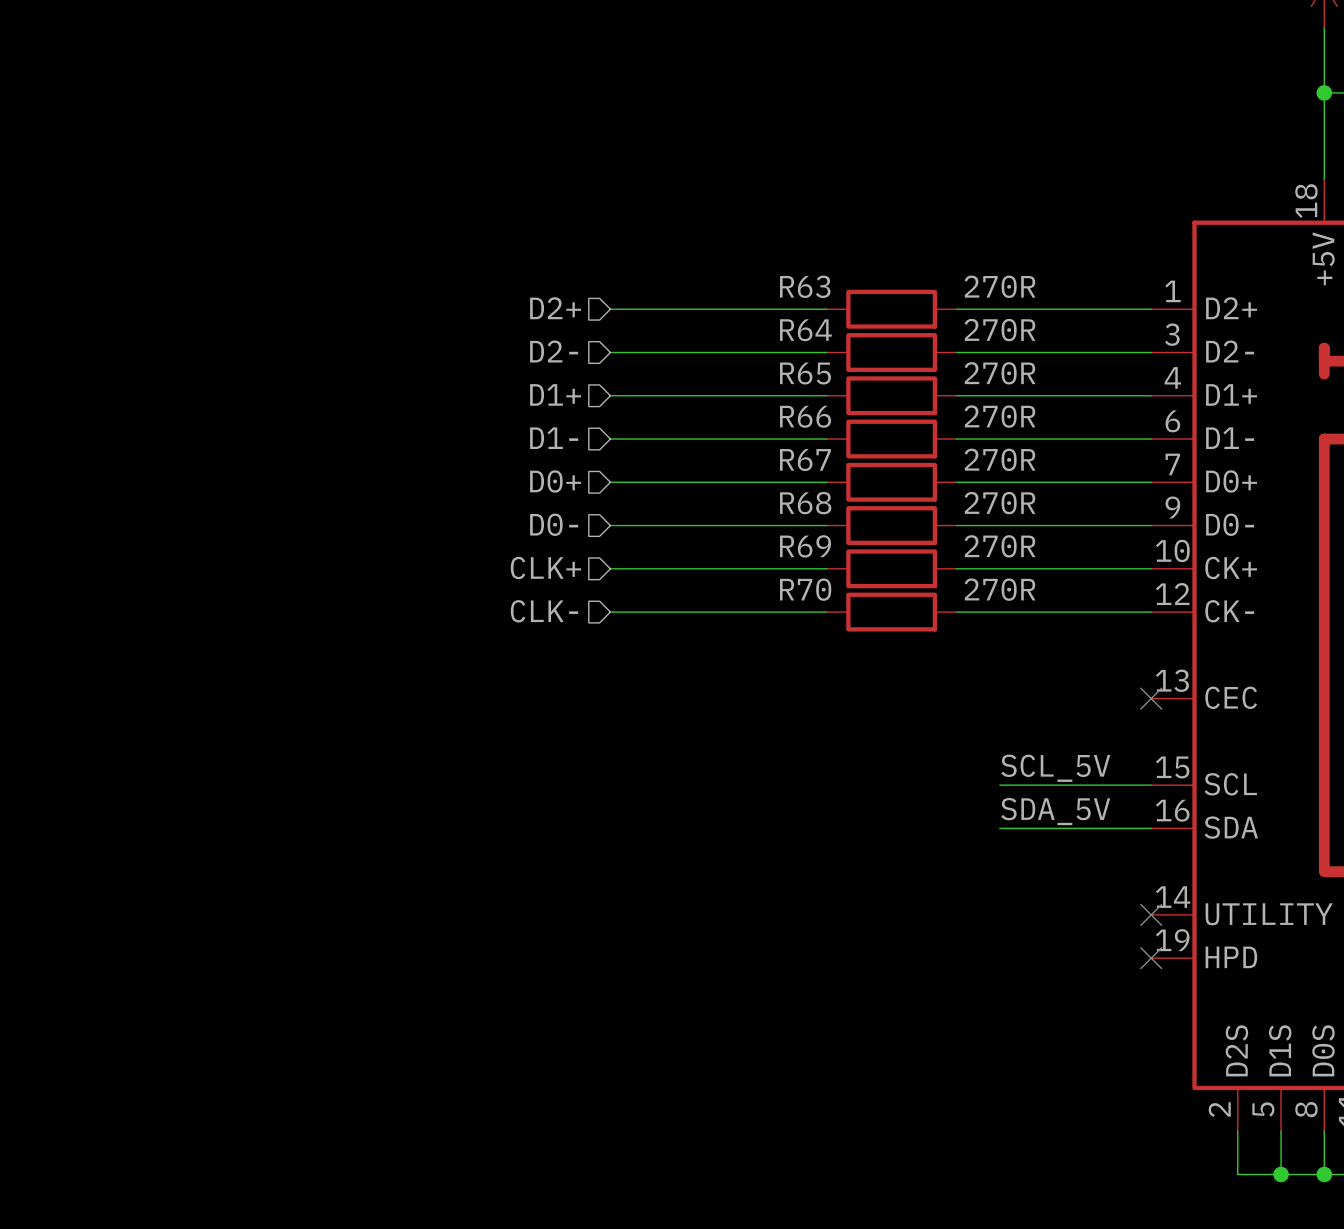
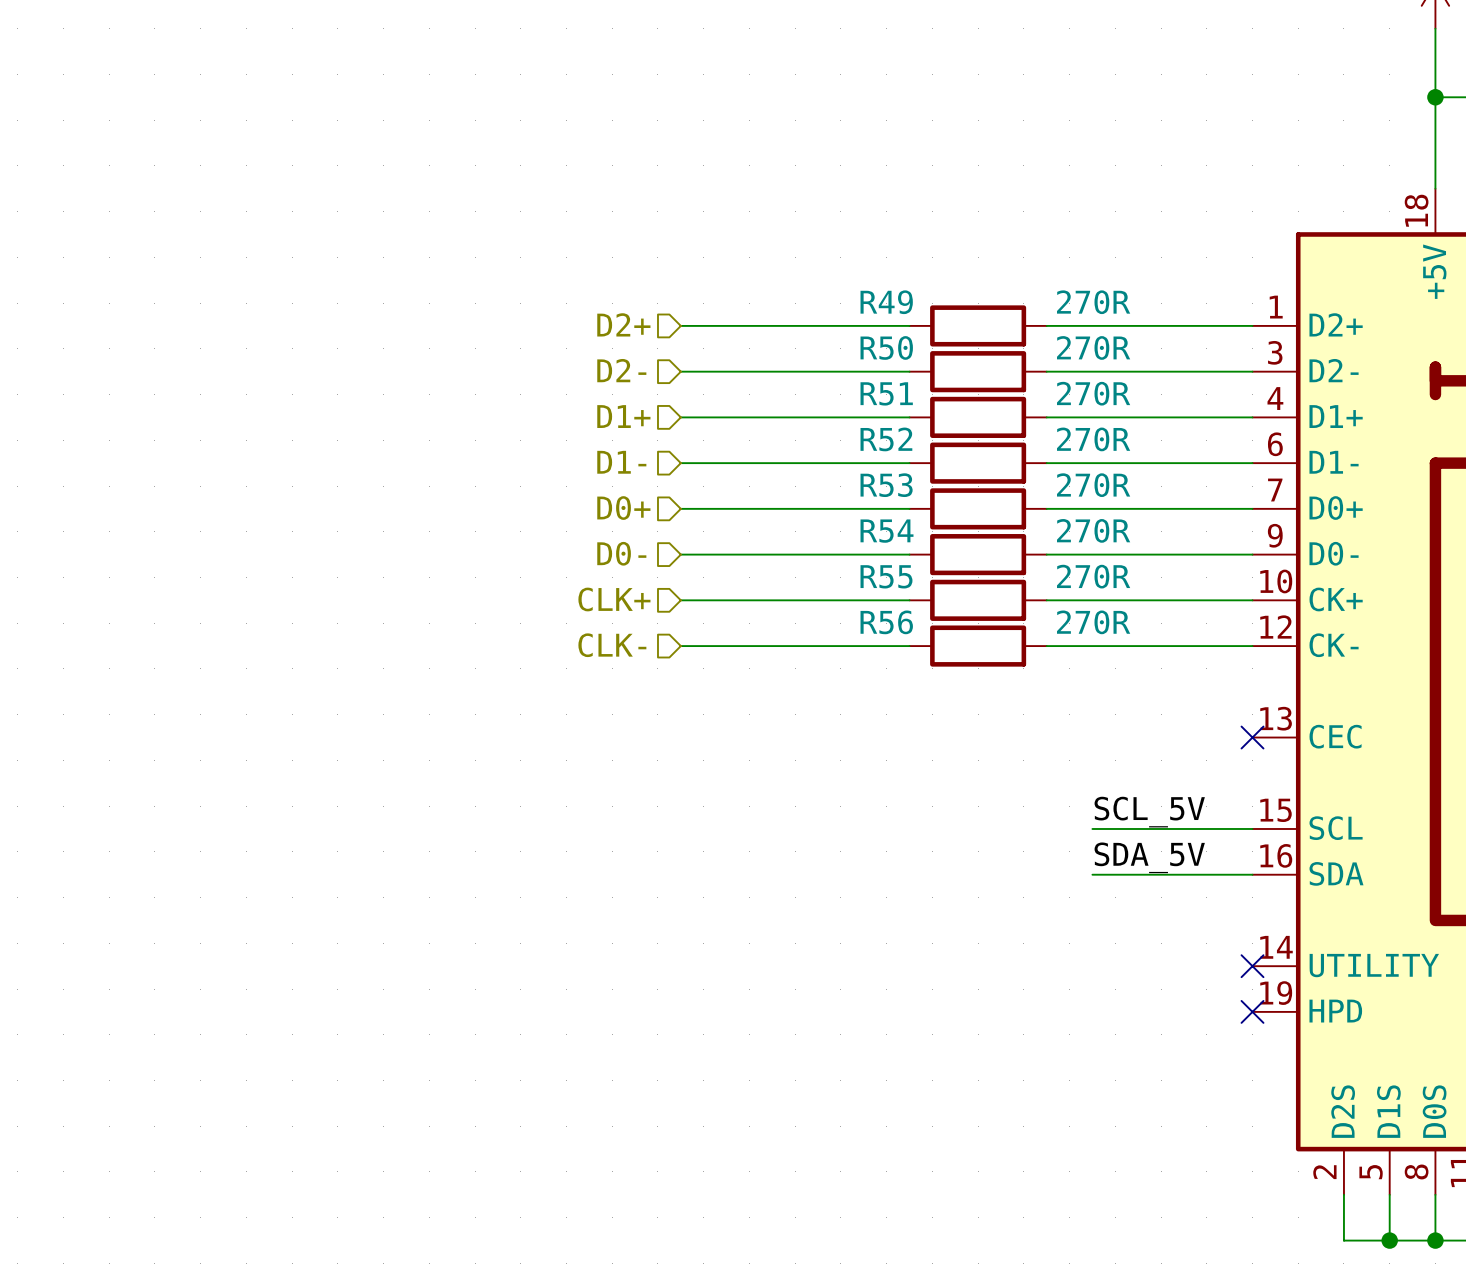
R63 name: R63 (805, 286) -> R49 (886, 302)
R64 name: R64 (805, 330) -> R50 (886, 347)
R65 name: R65 (805, 373) -> R51 (886, 393)
R66 name: R66 (805, 416) -> R52 (886, 439)
R67 name: R67 (805, 460) -> R53 (886, 485)
R68 name: R68 (805, 503) -> R54 (886, 531)
R69 name: R69 (805, 546) -> R55 (886, 576)
R70 name: R70 (805, 589) -> R56 (886, 622)

